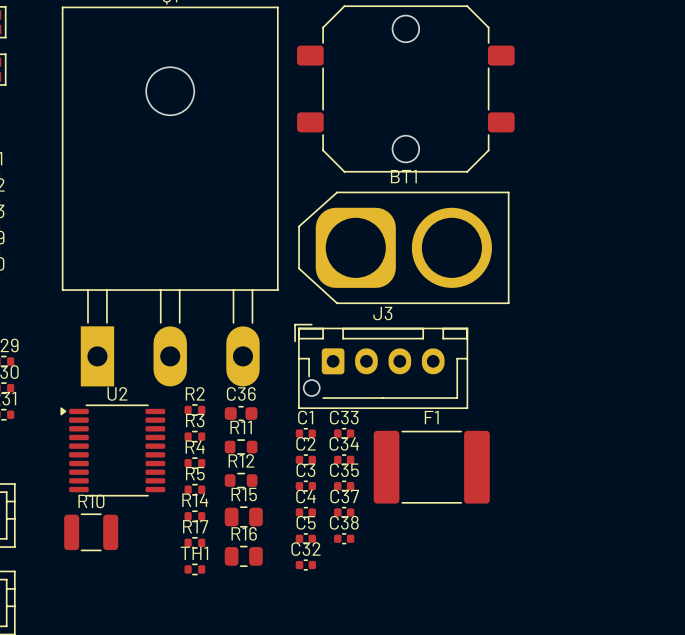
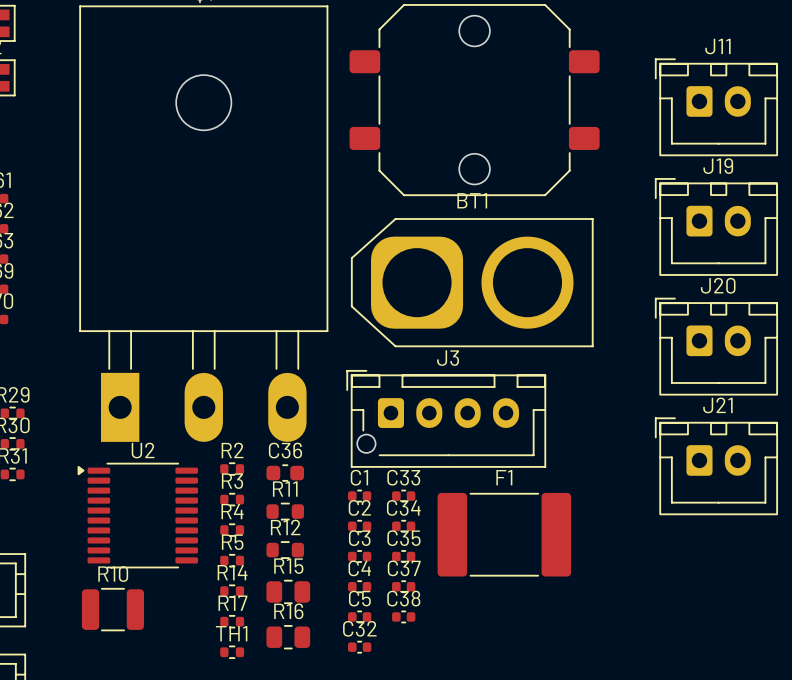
J11: none -> (716, 107)
J19: none -> (716, 226)
J20: none -> (716, 346)
J21: none -> (716, 466)

